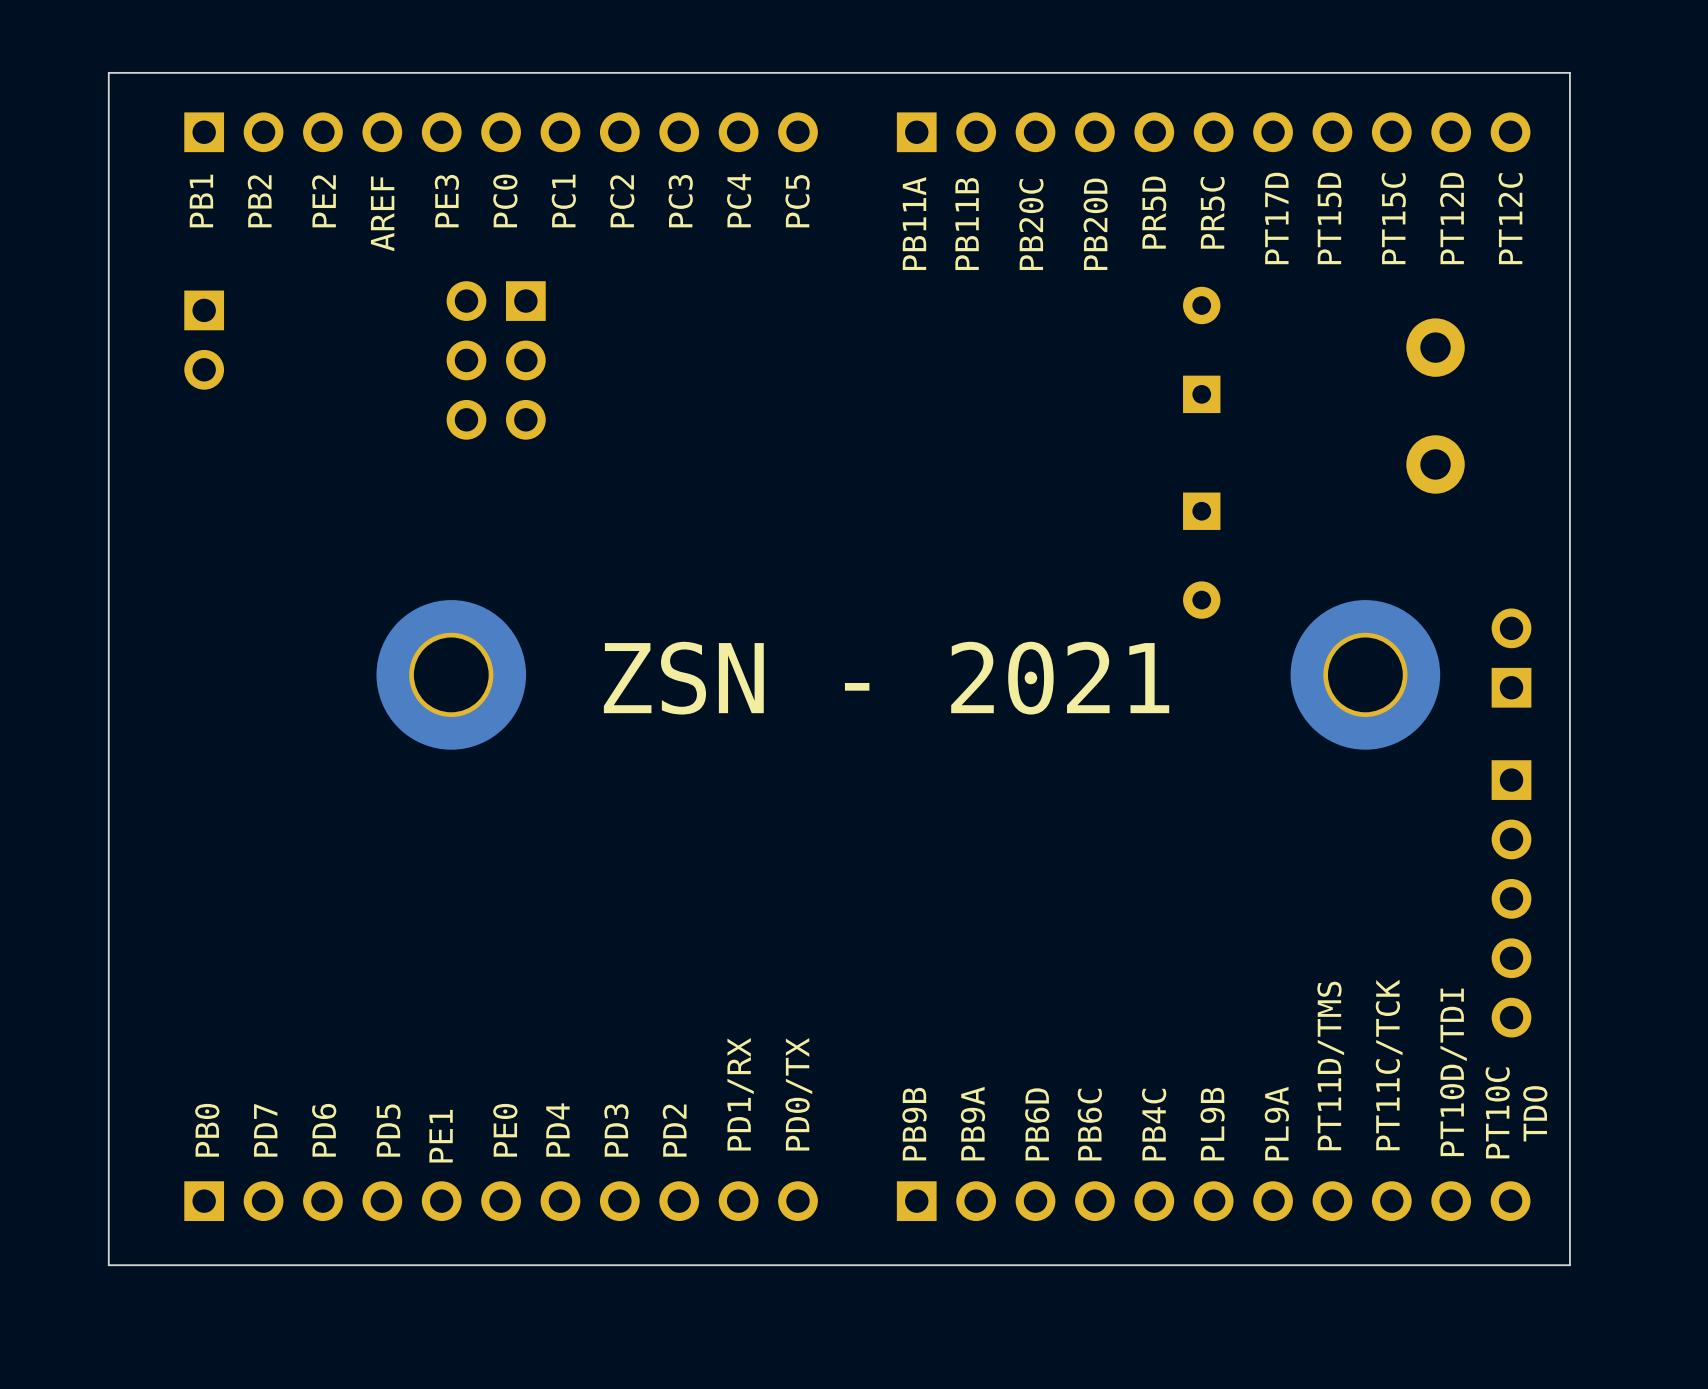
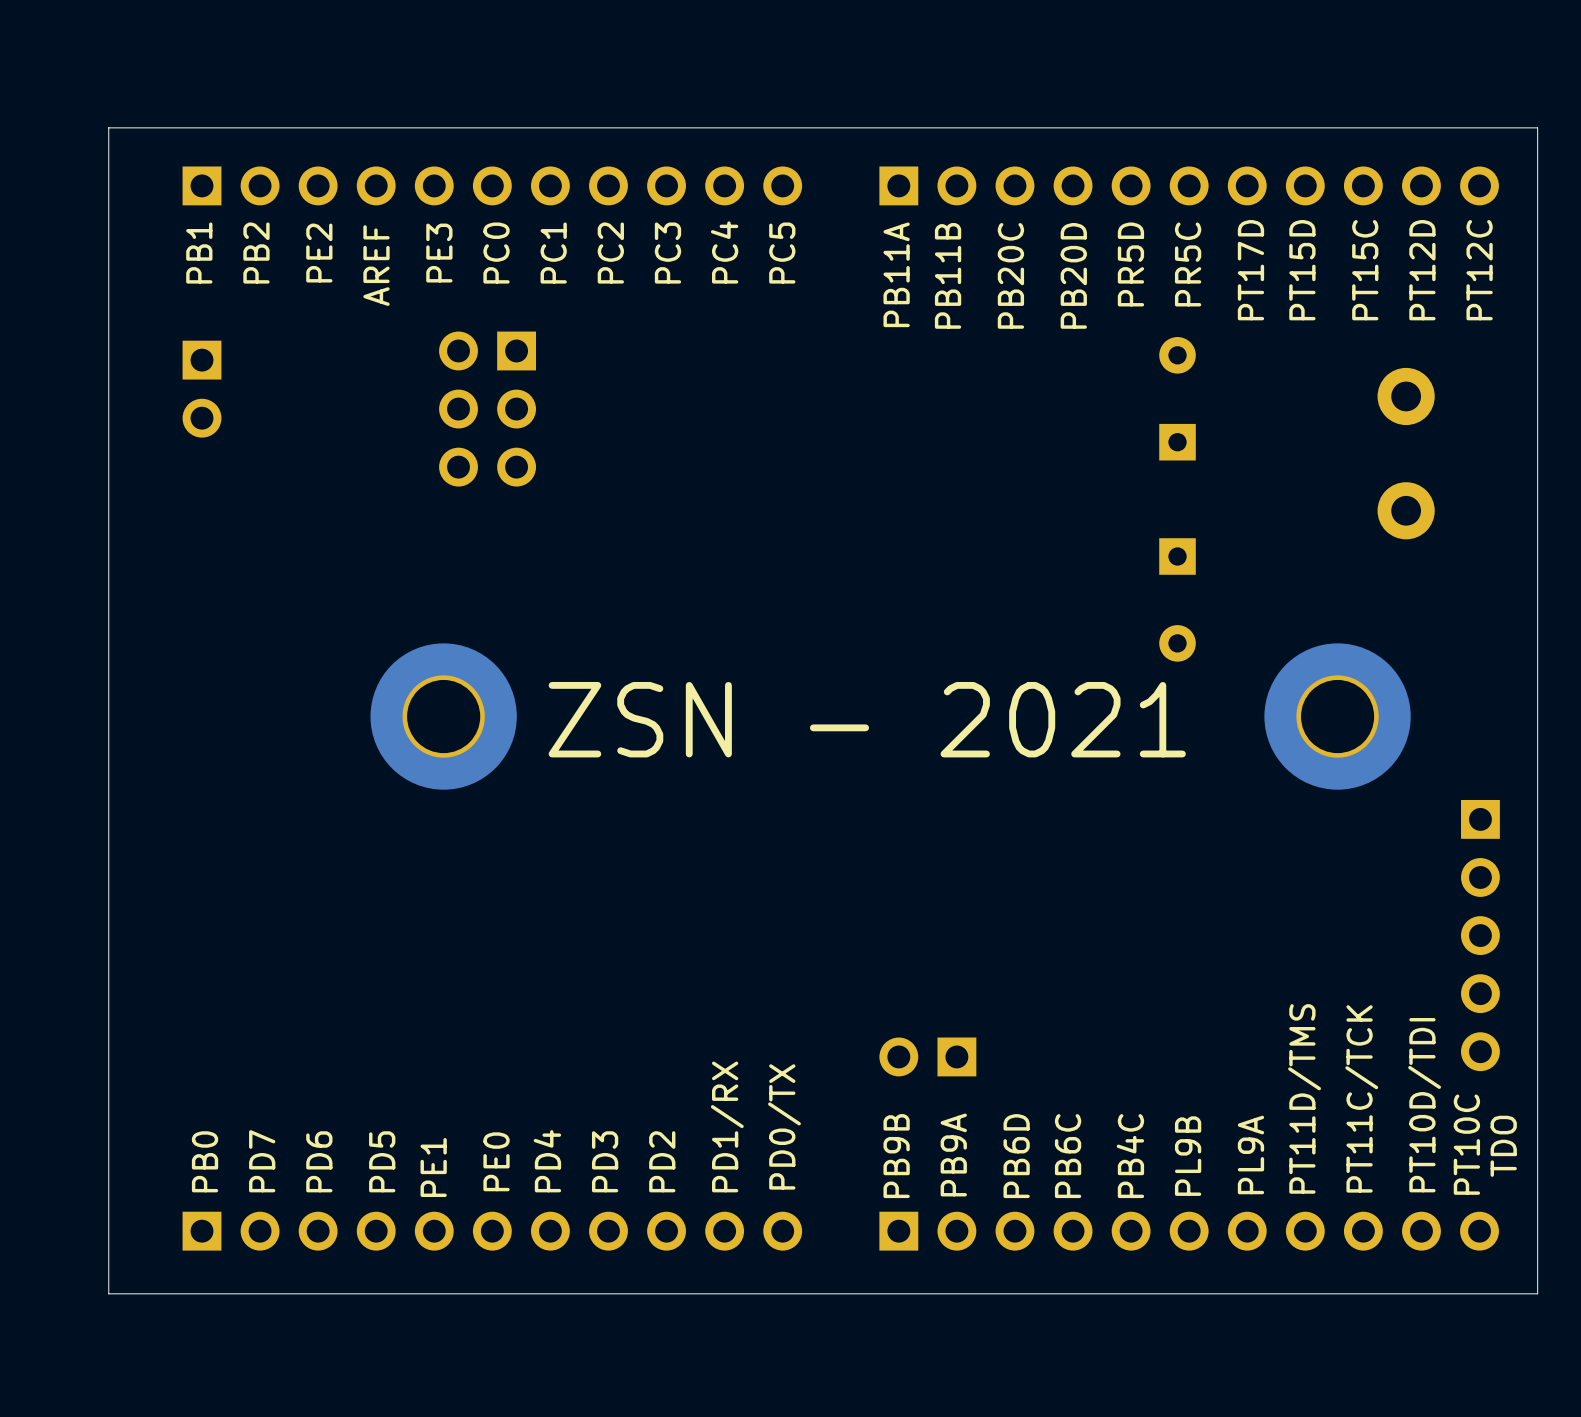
part: (1511, 658) -> none
part: none -> (927, 1056)

